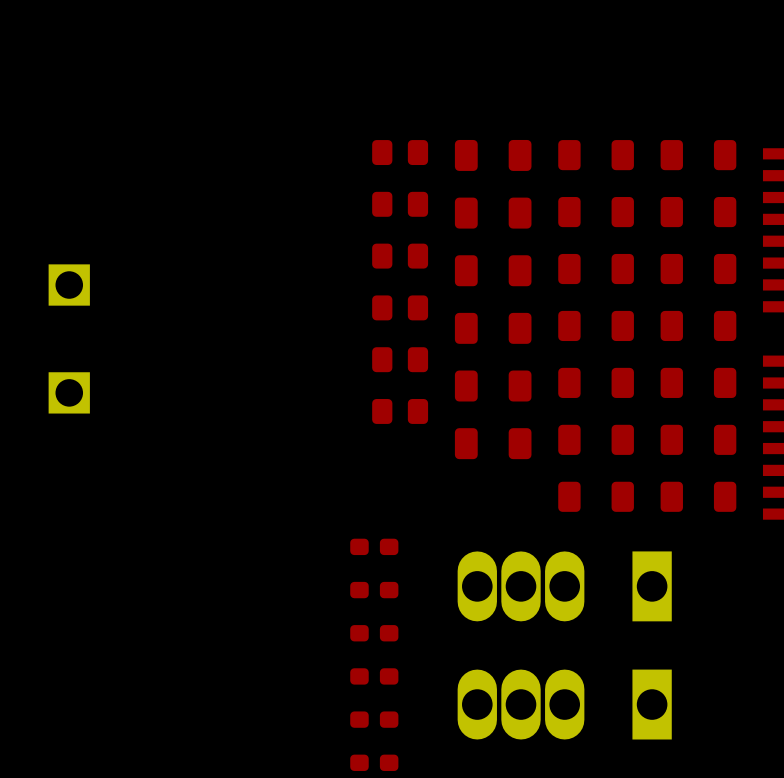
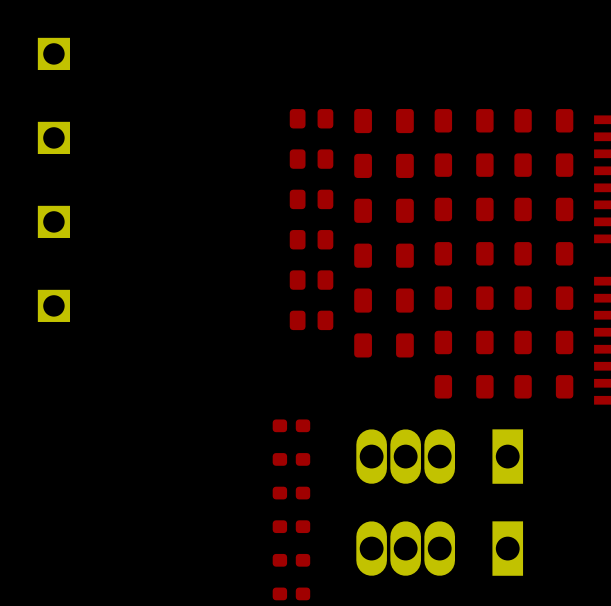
part: none -> (53, 53)
part: none -> (53, 137)

